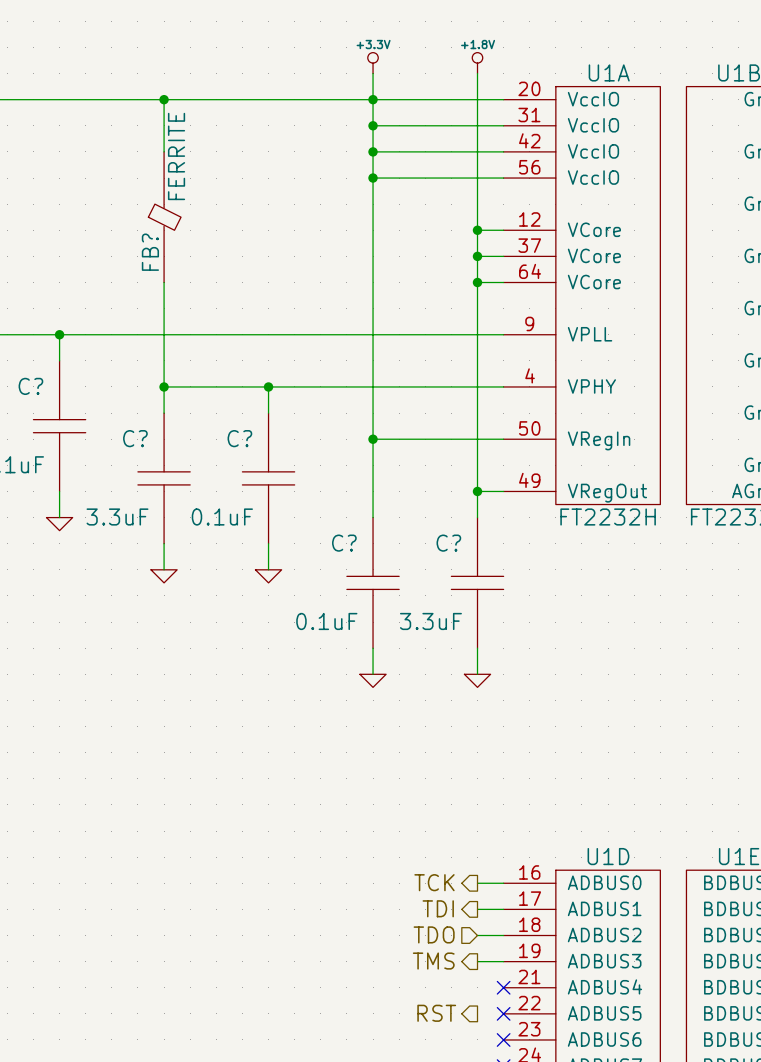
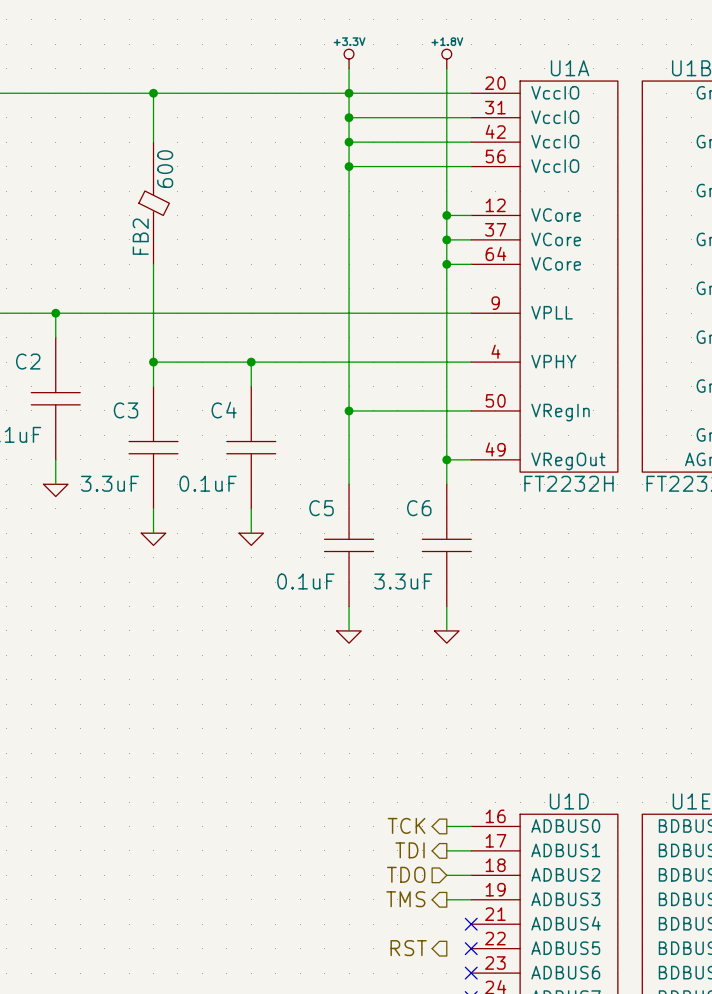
FB? value: FERRITE (176, 156) -> 600 (165, 169)
FB? name: FB? (150, 252) -> FB2 (140, 236)
C? name: C? (30, 386) -> C2 (28, 361)
C? name: C? (135, 438) -> C3 (126, 410)
C? name: C? (239, 438) -> C4 (224, 410)
C? name: C? (344, 543) -> C5 (321, 508)
C? name: C? (448, 543) -> C6 (419, 508)

